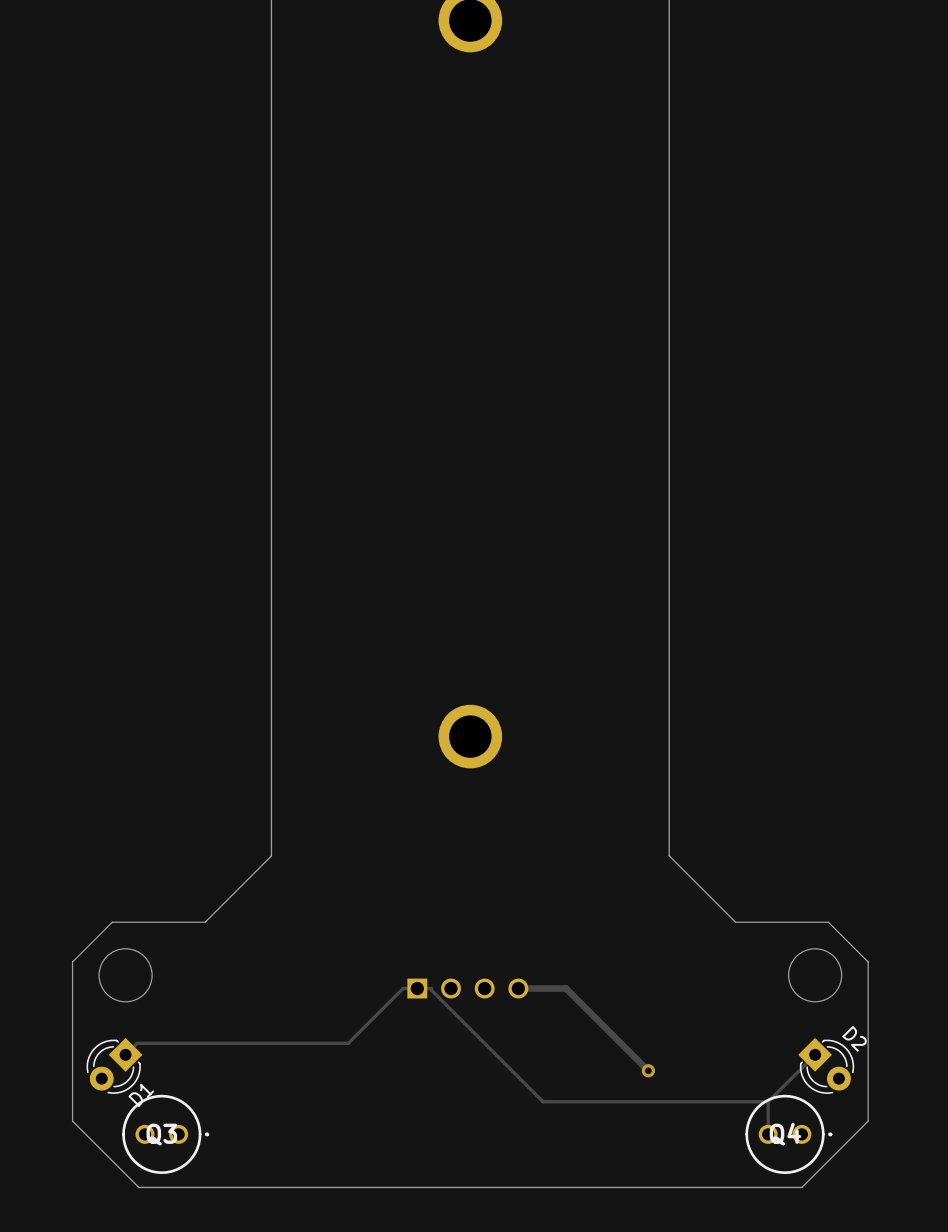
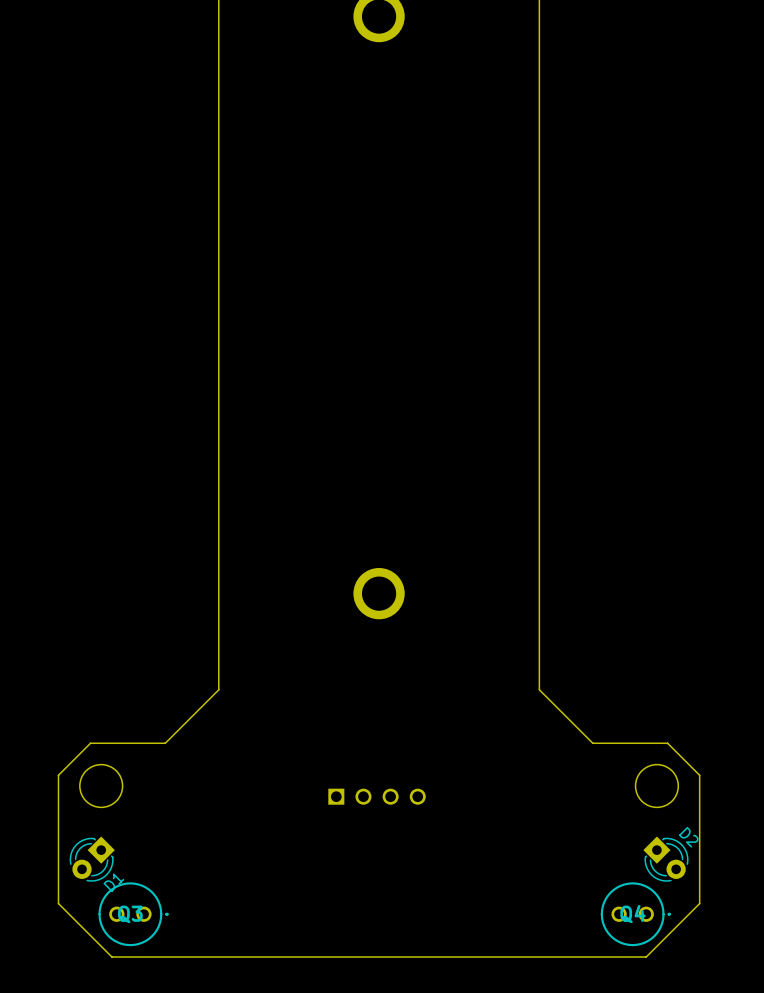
track: (518, 988) (566, 988) (648, 1070) -> none
track: (125, 1054) (137, 1043) (348, 1043) (403, 988) (431, 988) (543, 1101) (768, 1101) -> none
track: (815, 1054) (768, 1101) -> none
via: (648, 1070) -> none
track: (768, 1101) (768, 1134) -> none

